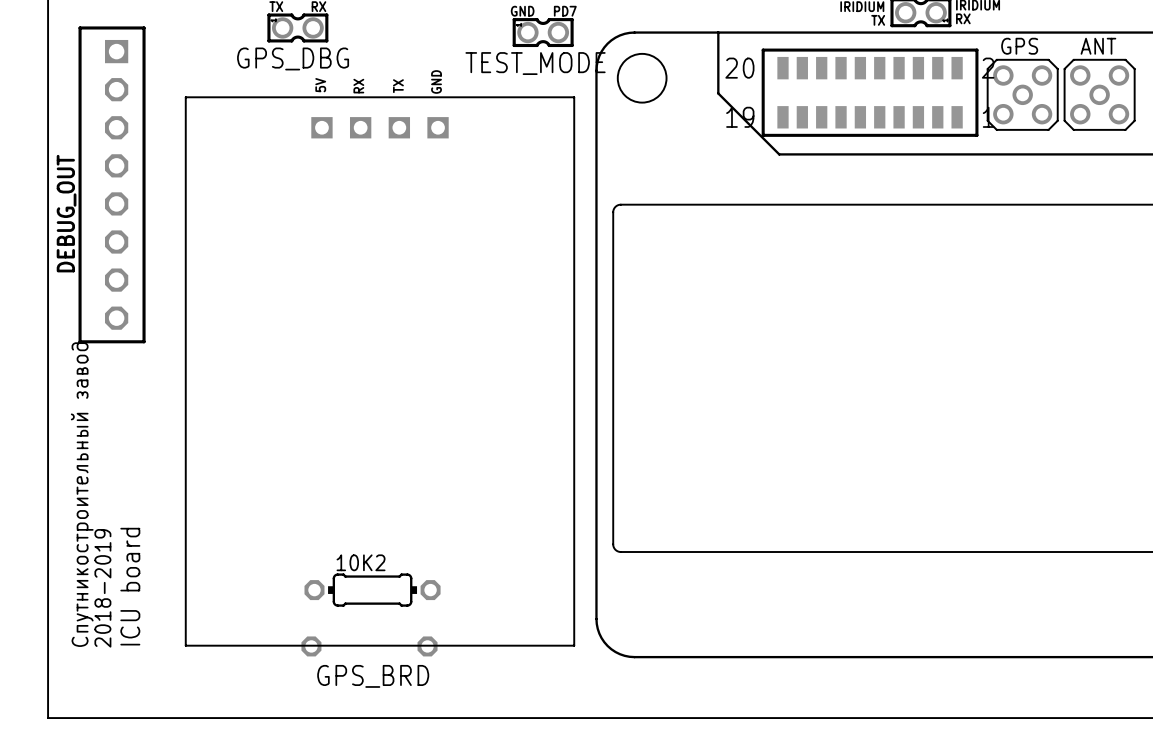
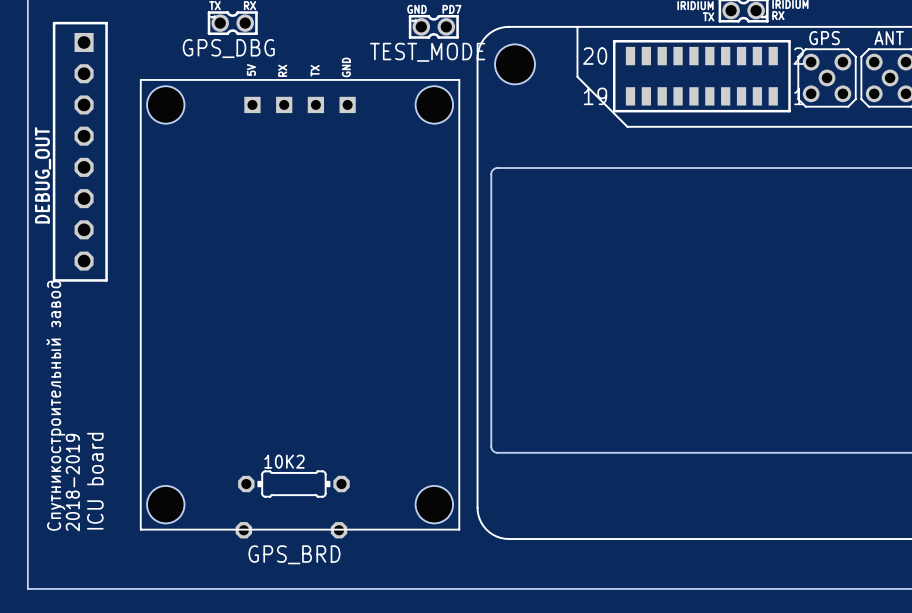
GPS_BRD footprint: [184, 96, 576, 647] -> [139, 79, 461, 531]

